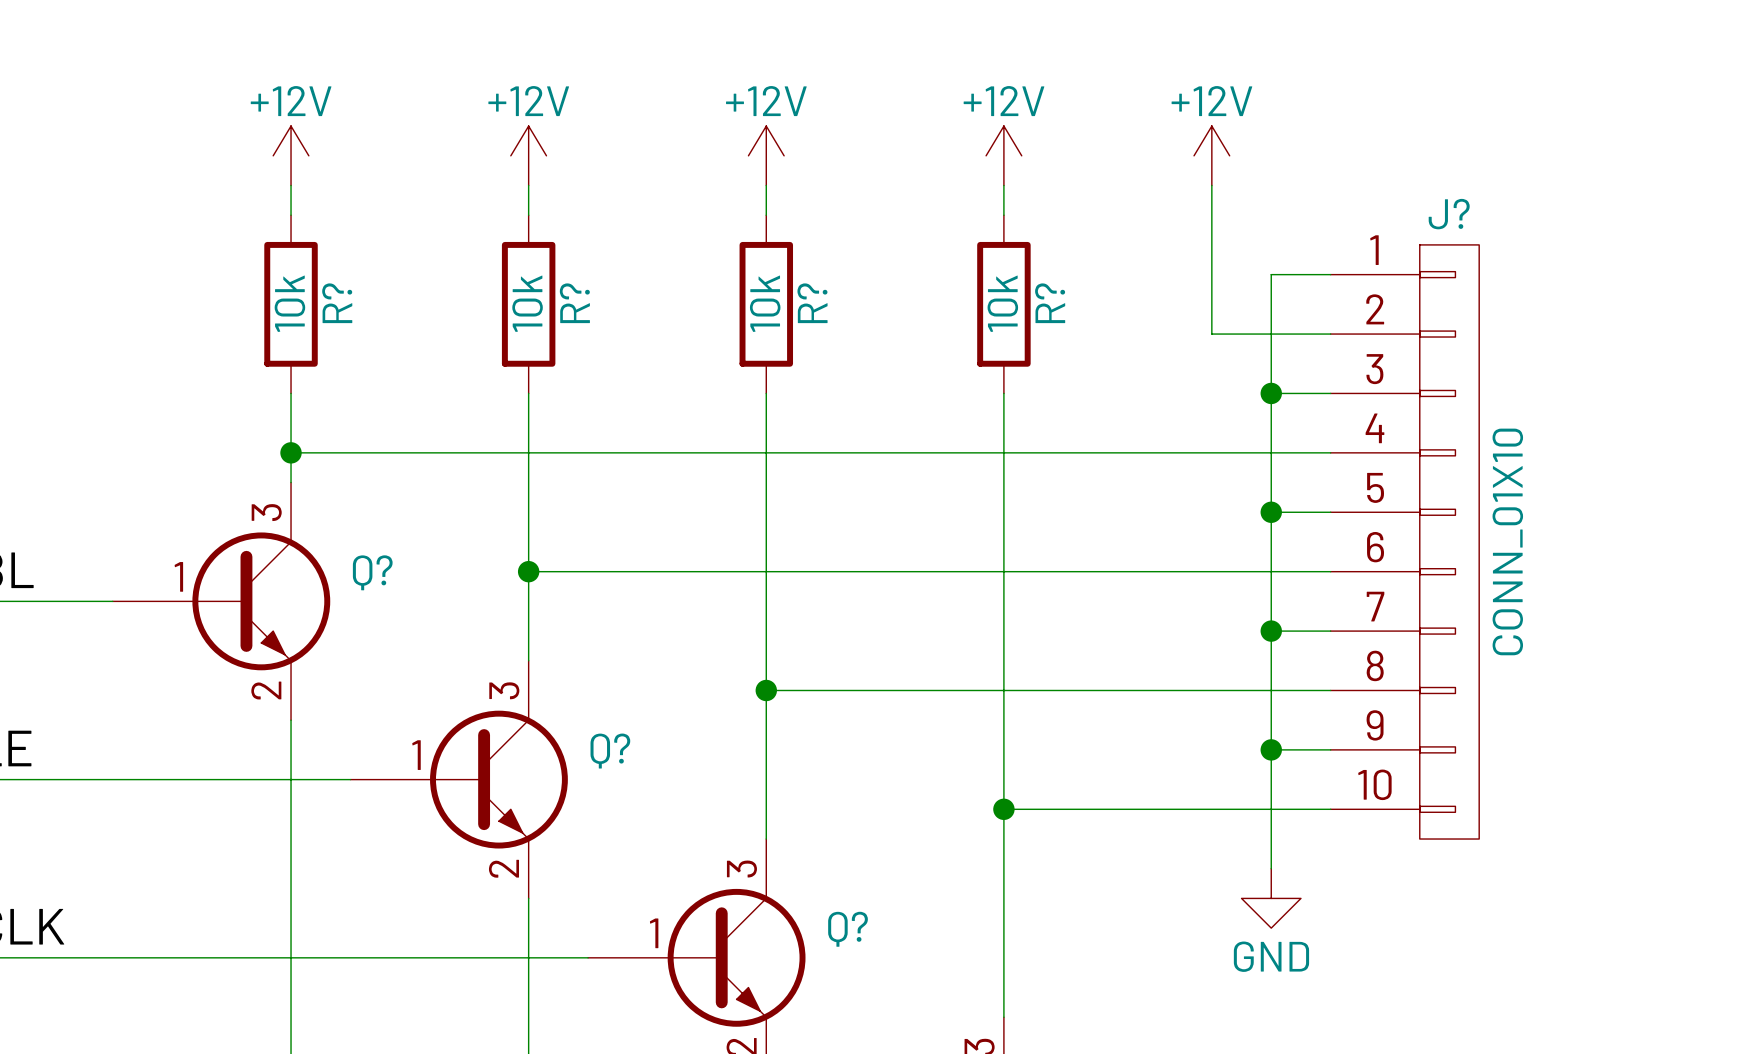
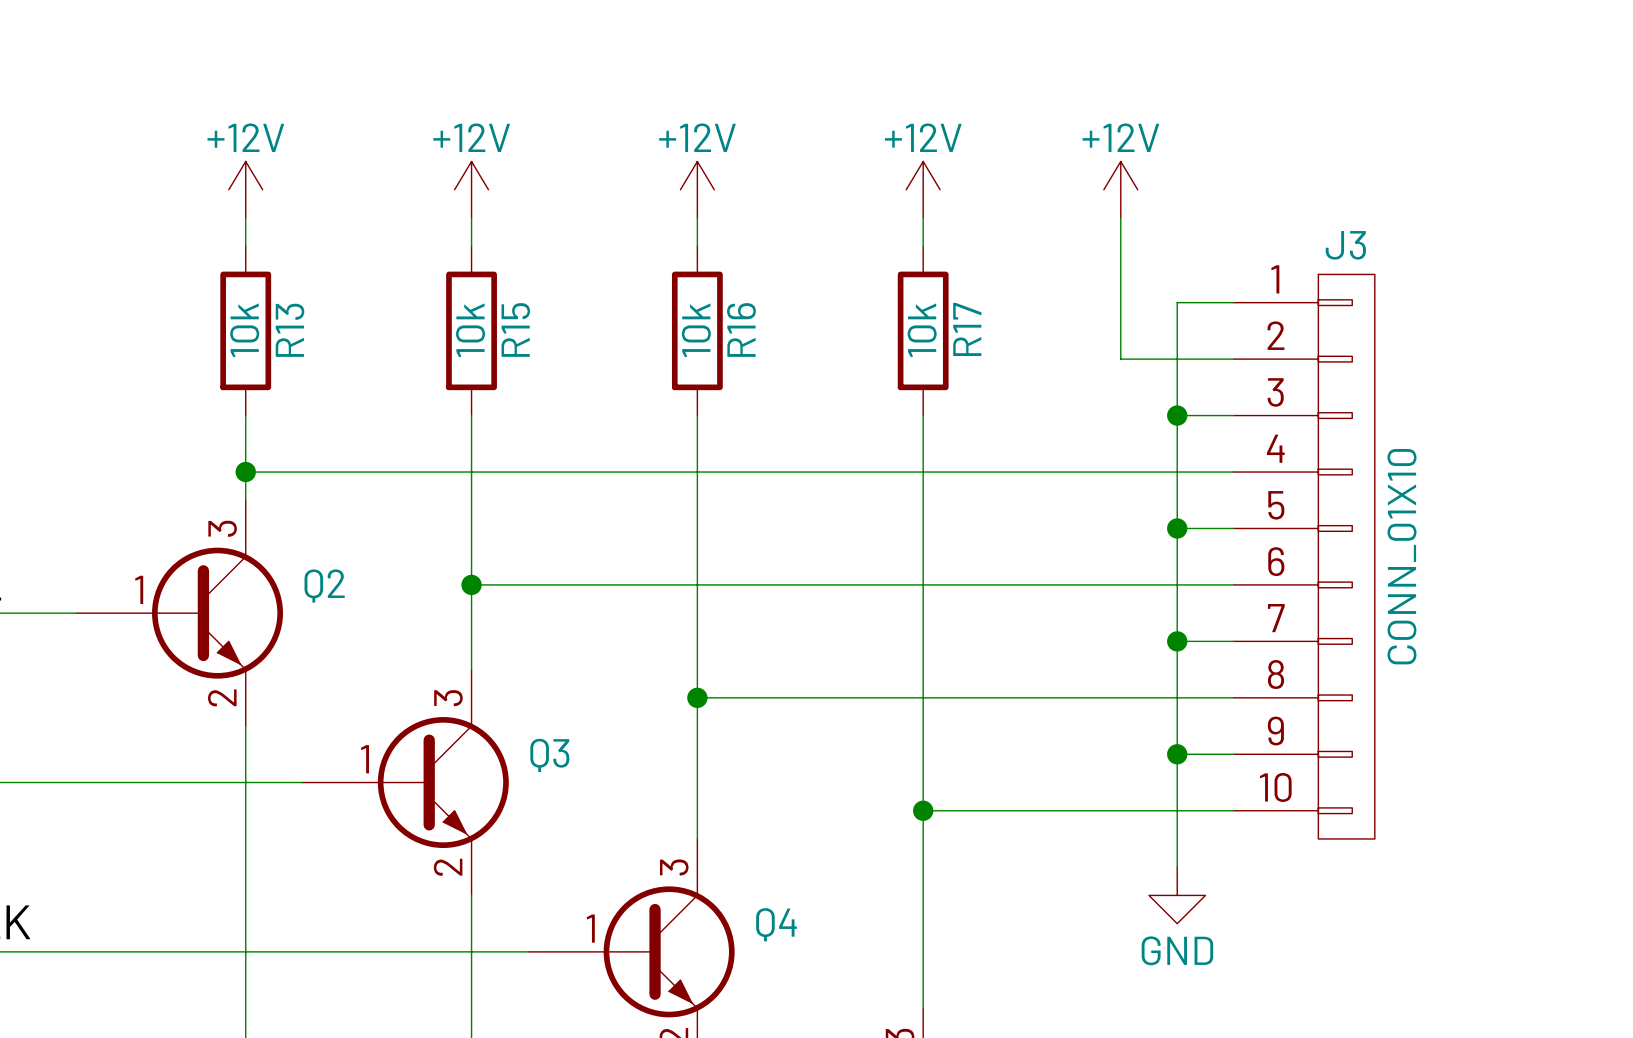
J? name: J? (1449, 214) -> J3 (1345, 245)
R? name: R? (337, 303) -> R13 (290, 330)
R? name: R? (574, 303) -> R15 (515, 329)
R? name: R? (812, 303) -> R16 (741, 330)
R? name: R? (1050, 303) -> R17 (967, 329)
Q? name: Q? (372, 572) -> Q2 (324, 586)
Q? name: Q? (610, 751) -> Q3 (549, 755)
Q? name: Q? (848, 929) -> Q4 (776, 924)

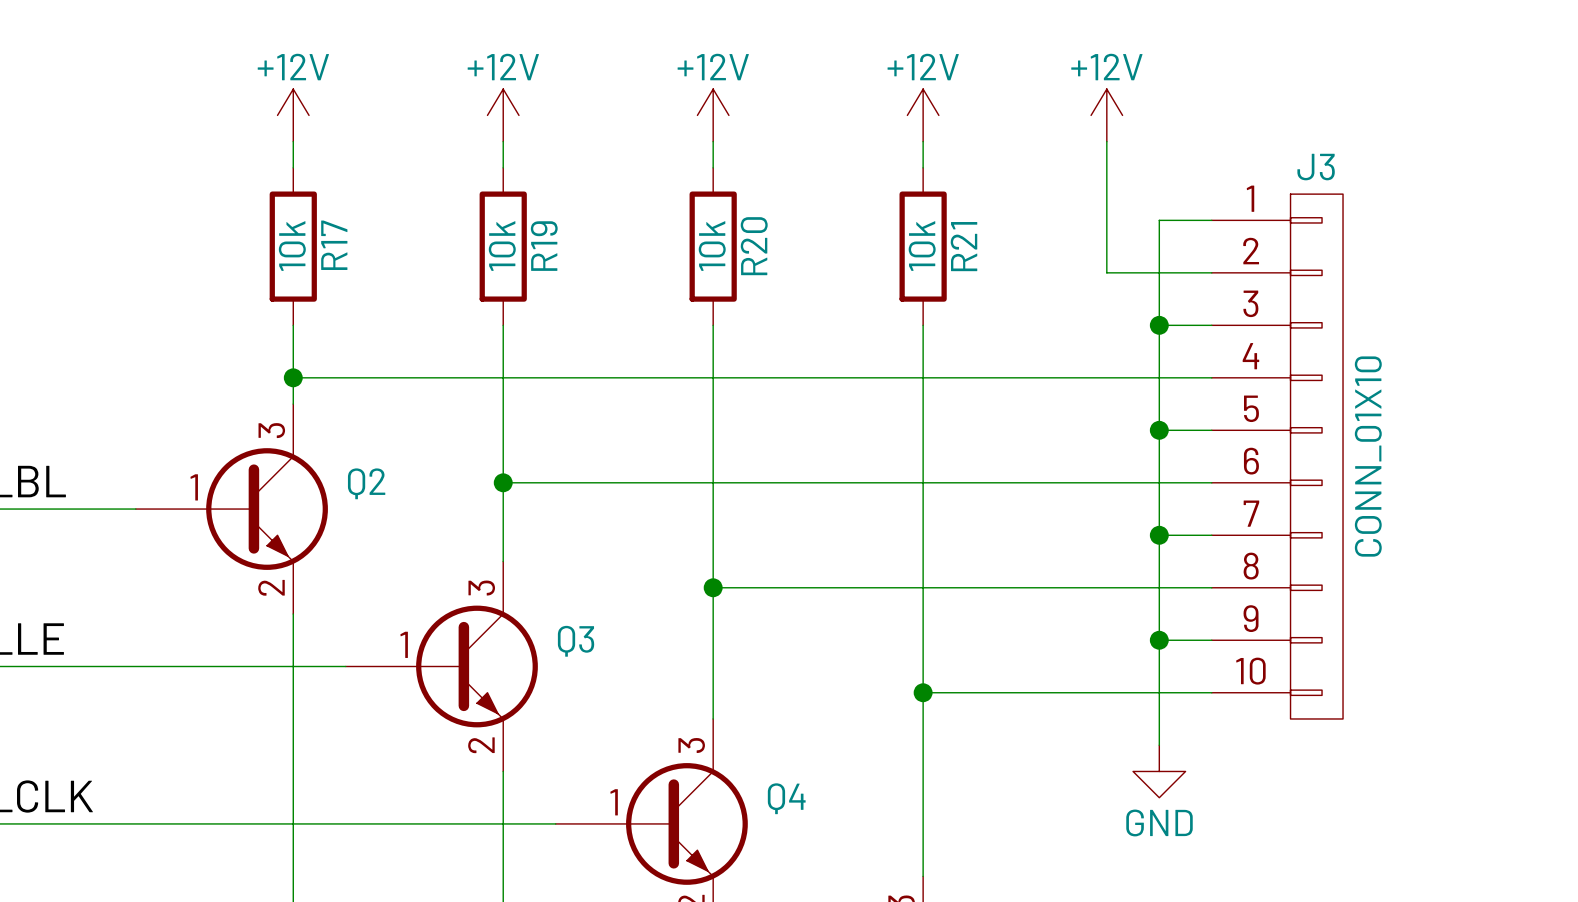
R15 name: R15 (515, 329) -> R19 (544, 246)
R17 name: R17 (967, 329) -> R21 (963, 246)
R13 name: R13 (290, 330) -> R17 (334, 245)
R16 name: R16 (741, 330) -> R20 (754, 246)

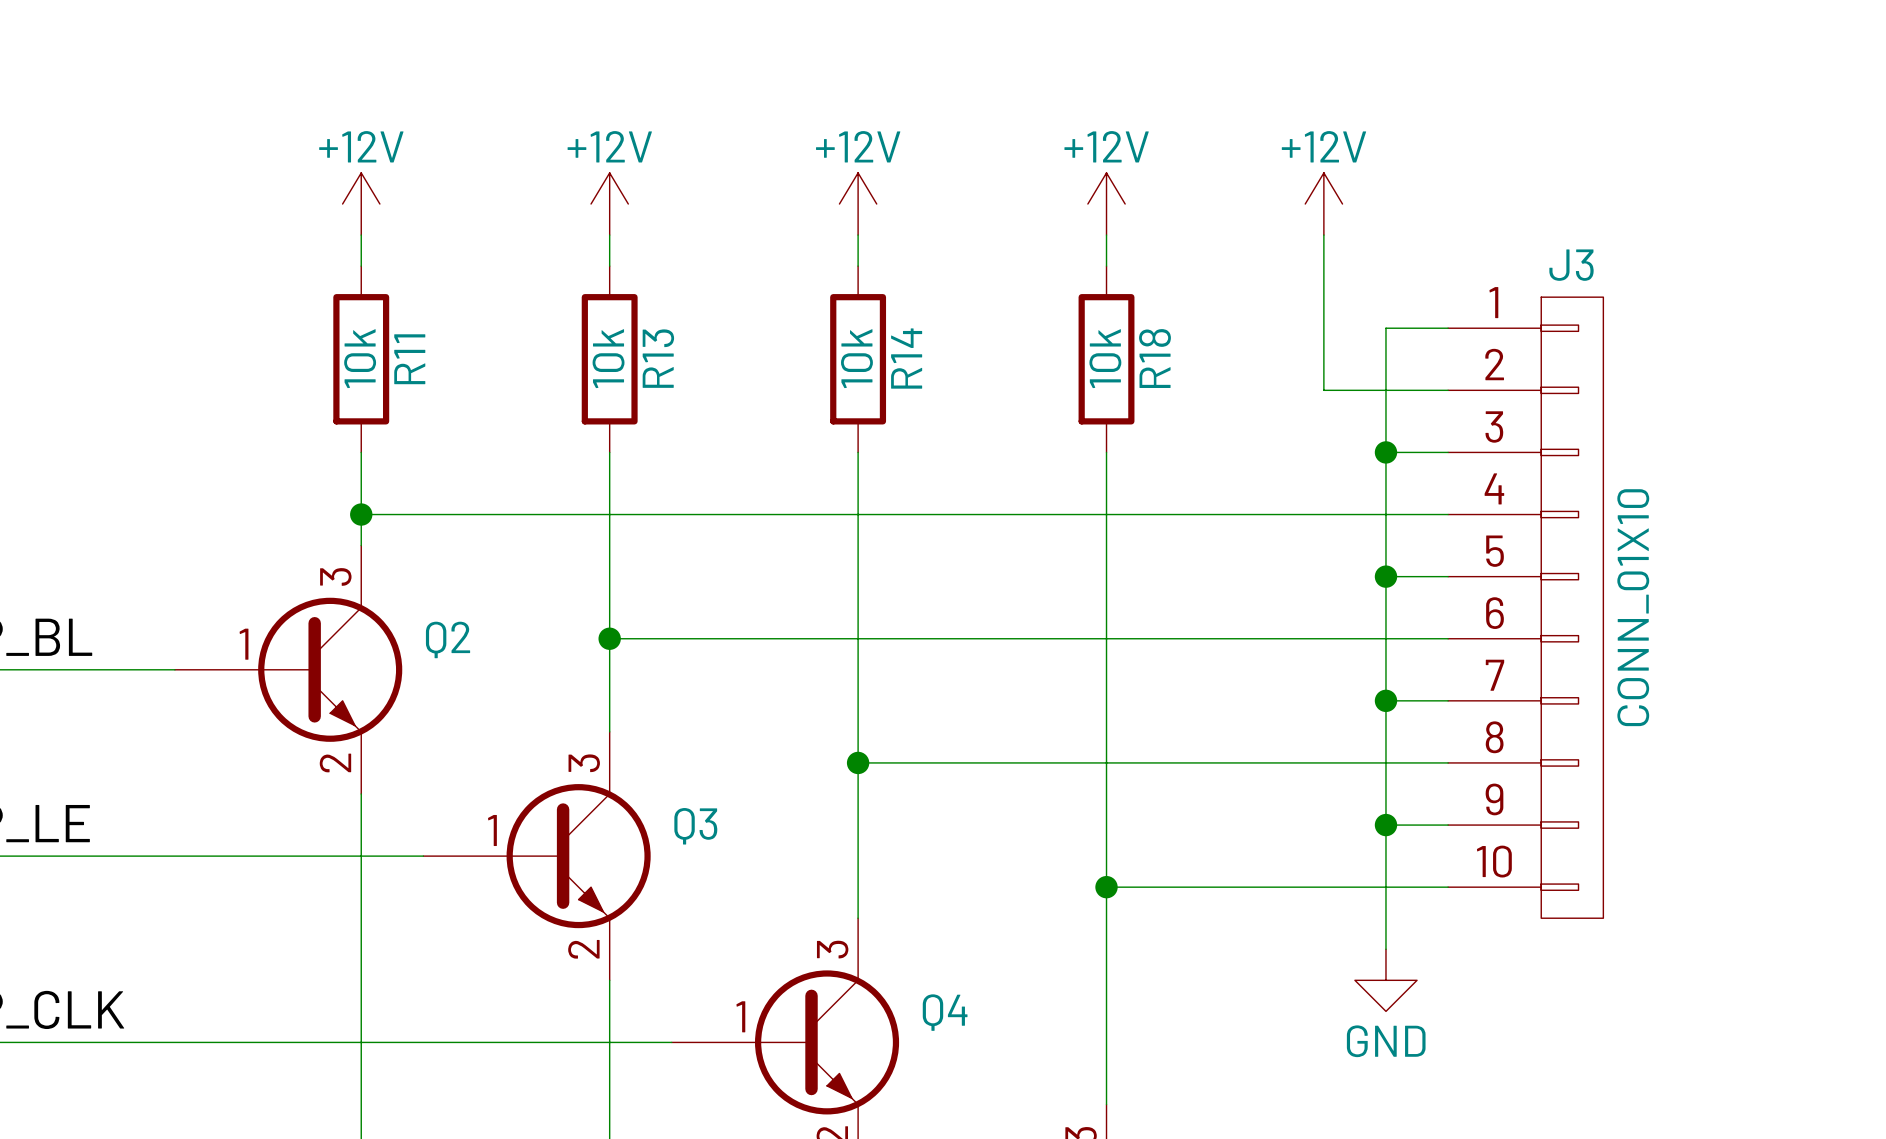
R17 name: R17 (334, 245) -> R11 (409, 359)
R19 name: R19 (544, 246) -> R13 (658, 358)
R20 name: R20 (754, 246) -> R14 (906, 358)
R21 name: R21 (963, 246) -> R18 (1154, 358)

